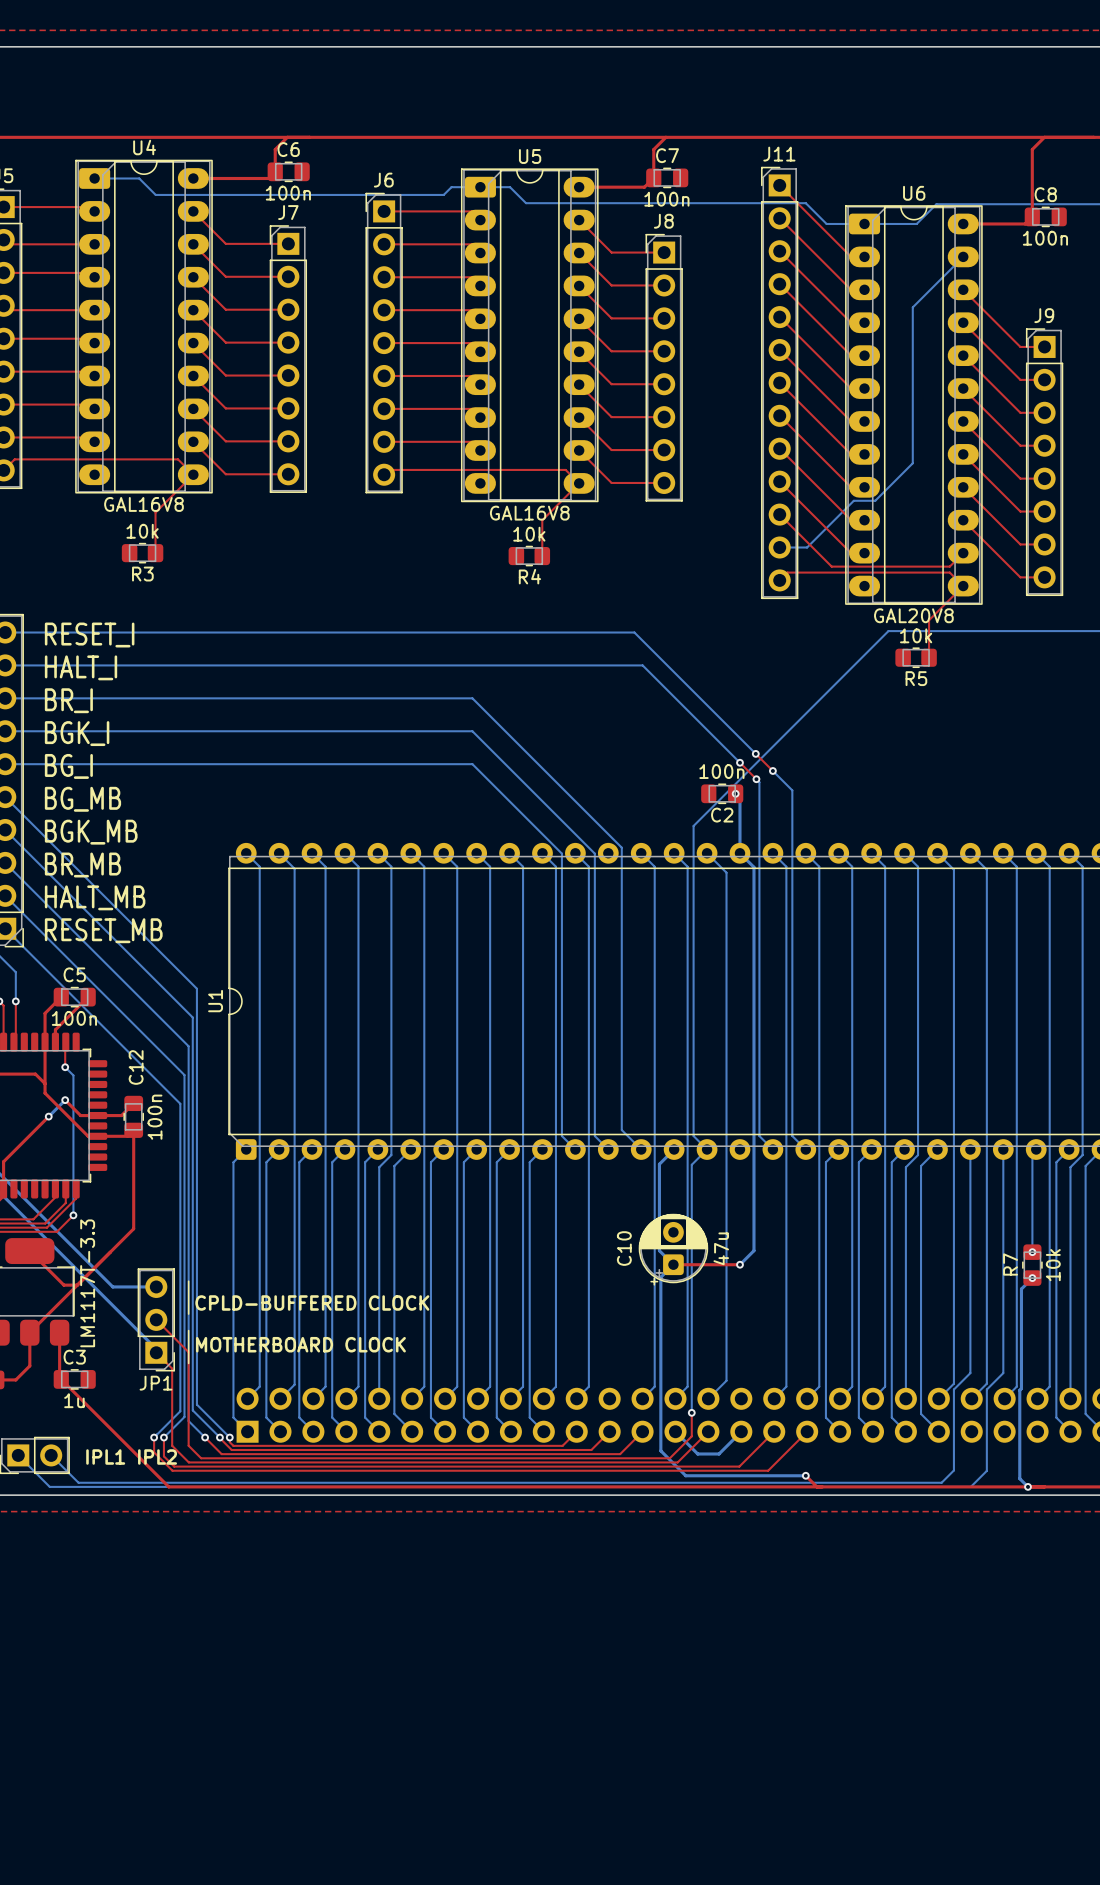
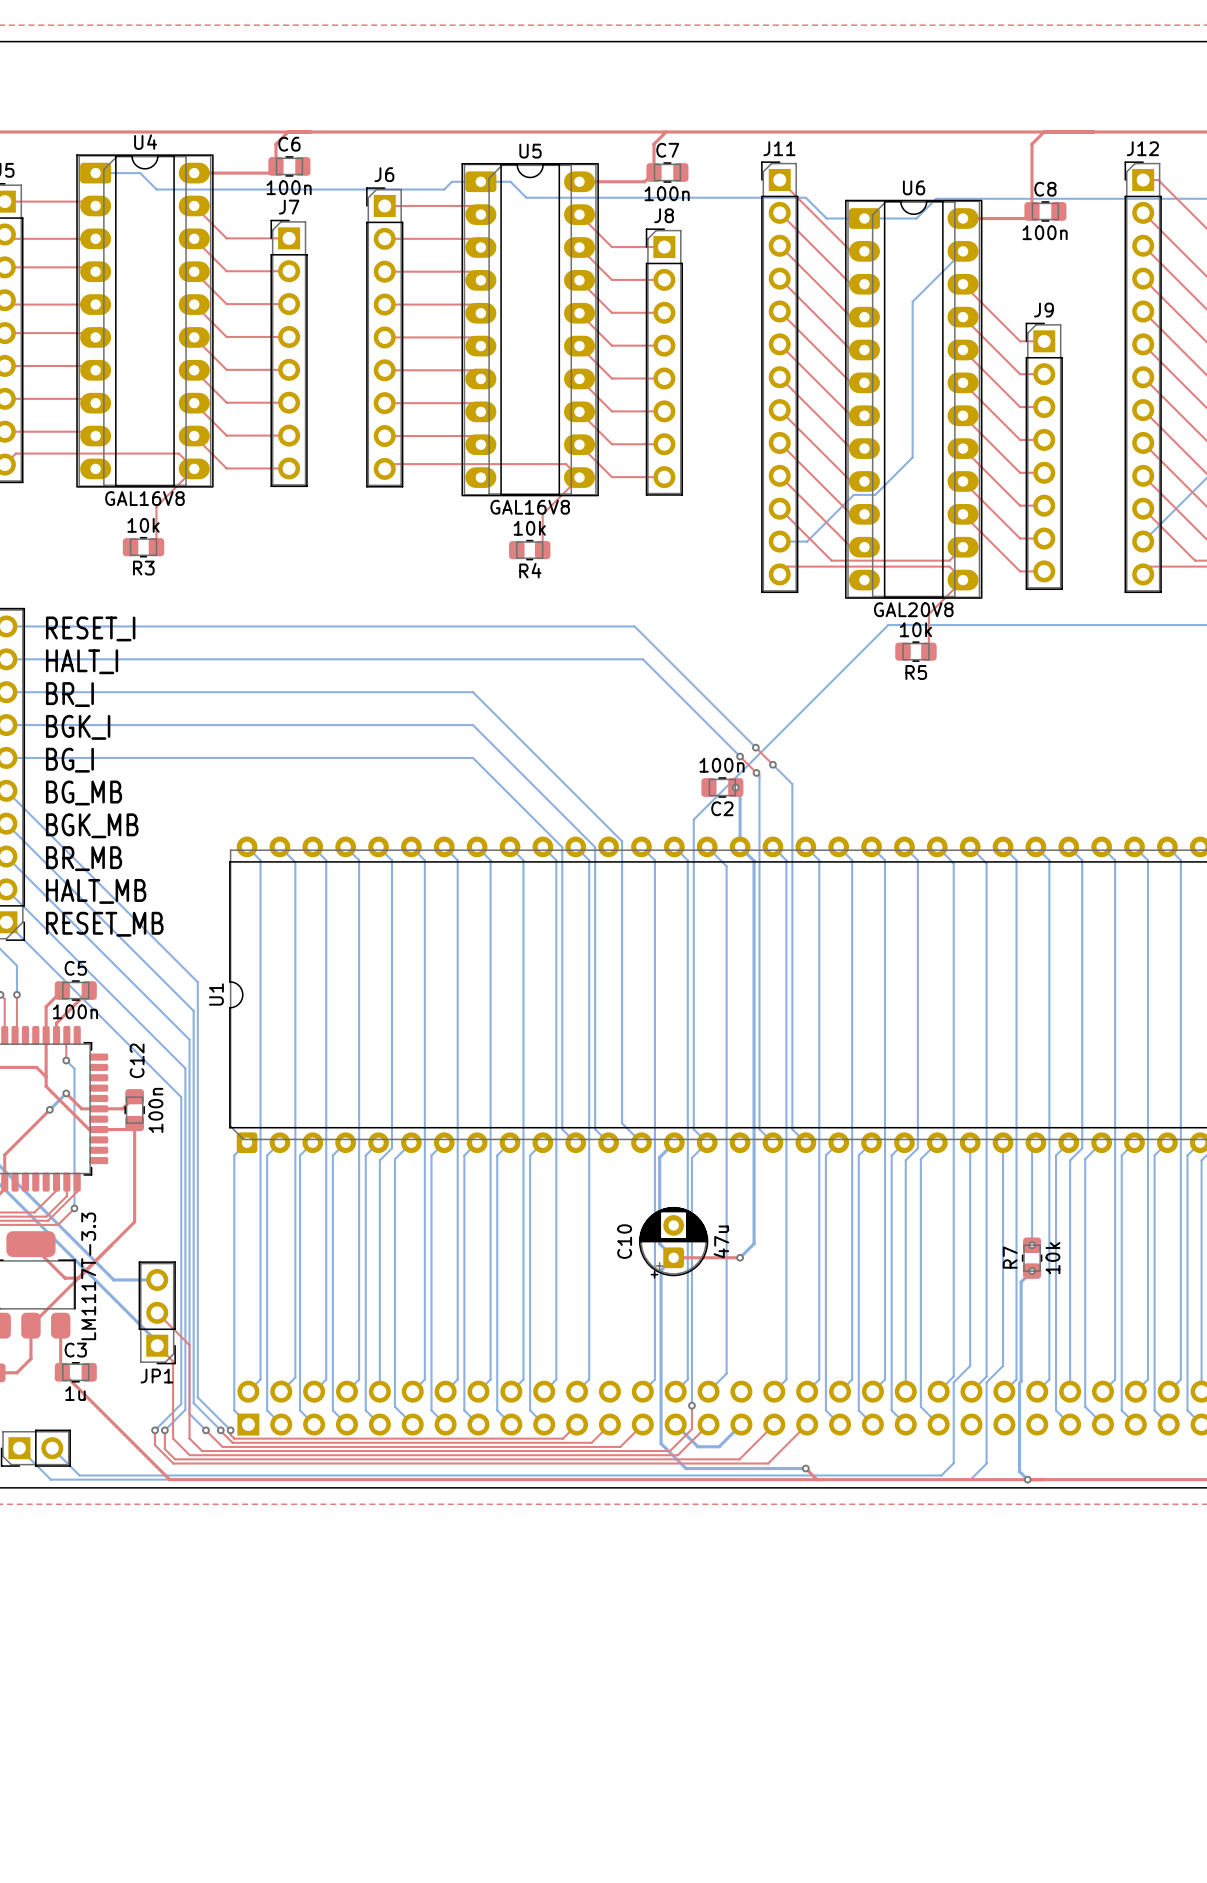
line: (188, 1281) (188, 1314) -> none
text: CPLD-BUFFERED CLOCK (312, 1302) -> none
line: (188, 1330) (188, 1363) -> none
text: MOTHERBOARD CLOCK (300, 1344) -> none
text: IPL1 IPL2 (131, 1457) -> none

